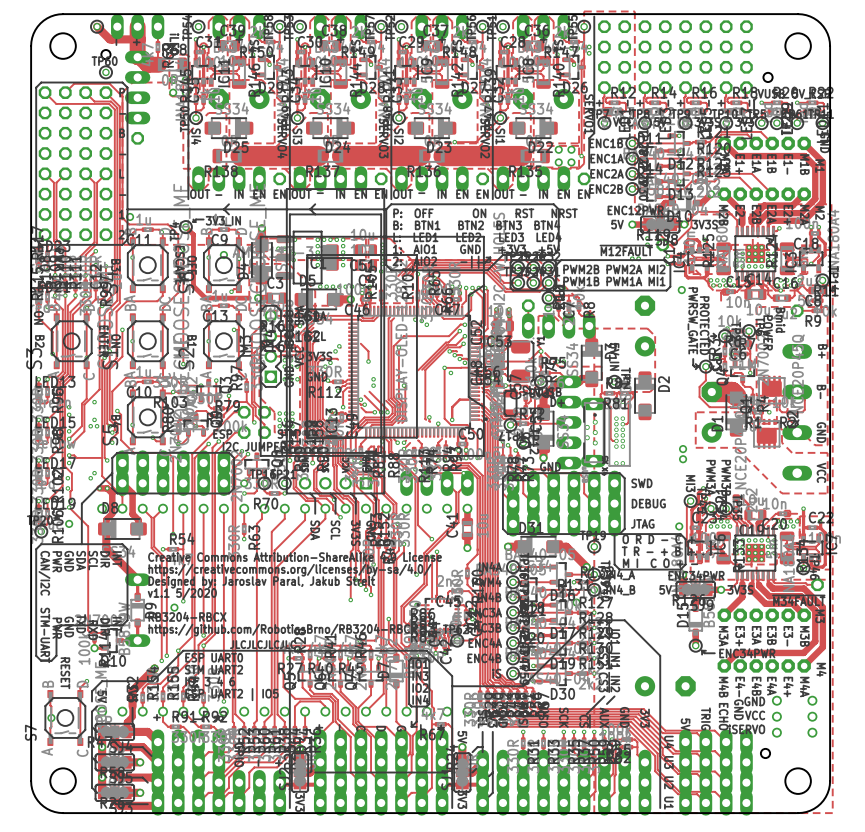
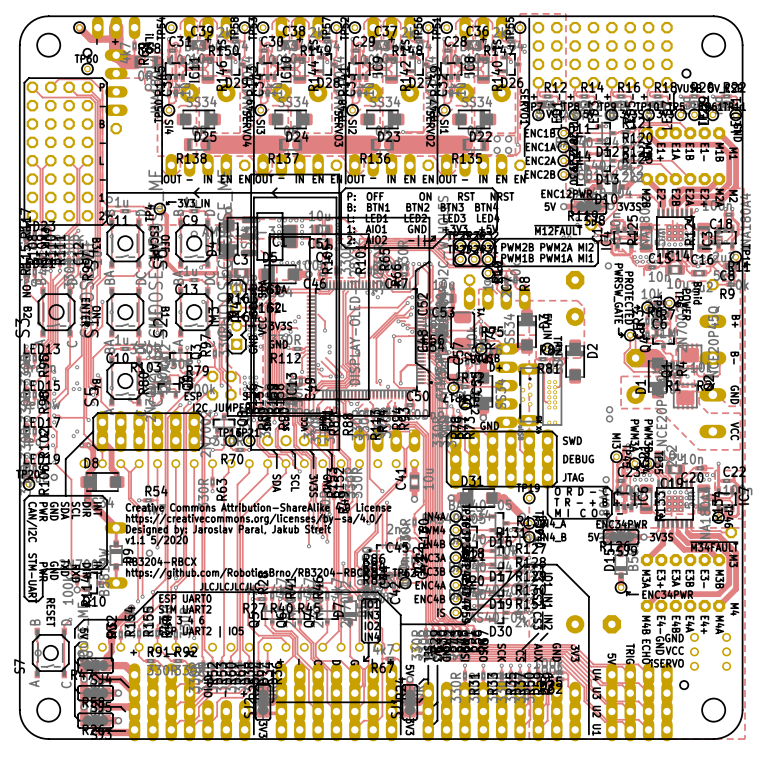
track: none -> (656, 332) (655, 338) (649, 336) (635, 337) (635, 358)

